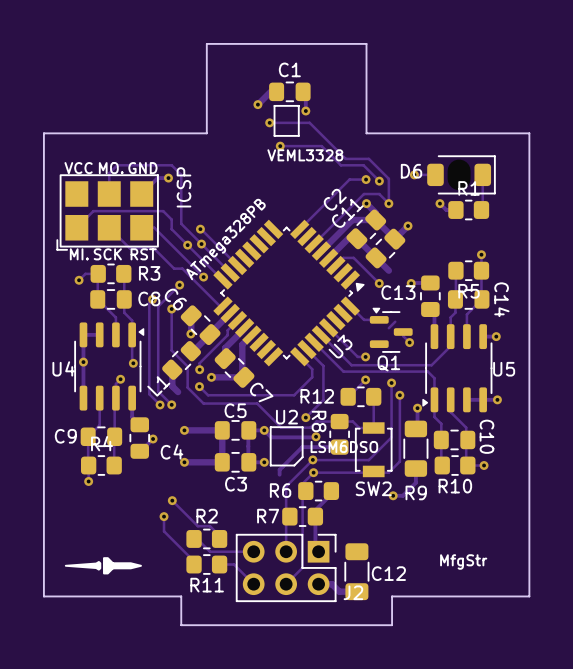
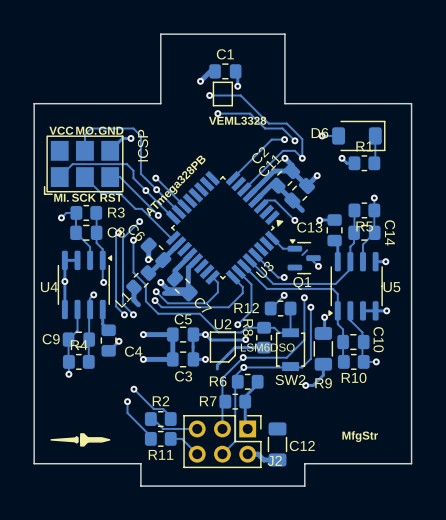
track: (237, 320) (227, 330) (227, 335) (199, 363) (199, 369) -> none
track: none -> (212, 277) (217, 282) (217, 292) (206, 303) (167, 303) (156, 291)
track: none -> (160, 282) (168, 289) (187, 289)
via: none -> (160, 282)
via: (199, 369) -> none
via: none -> (156, 291)
via: (211, 377) -> none

